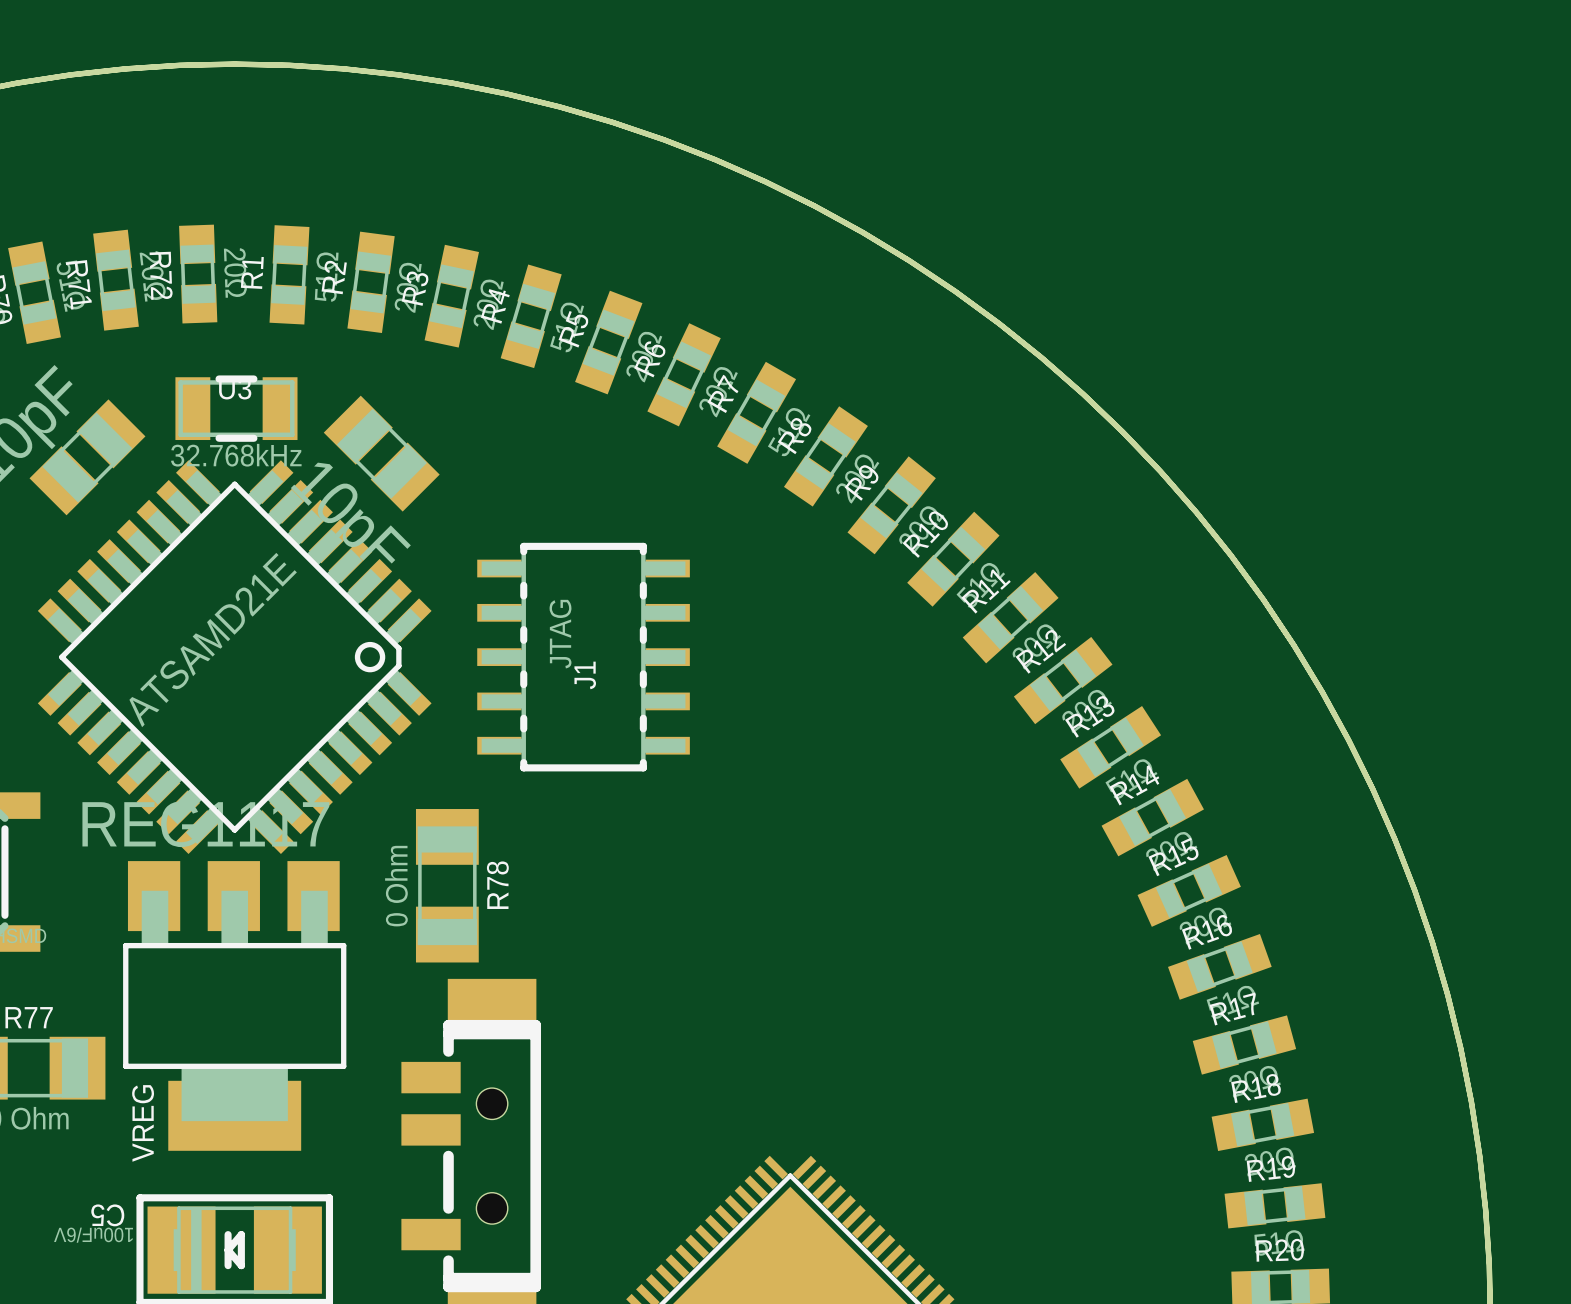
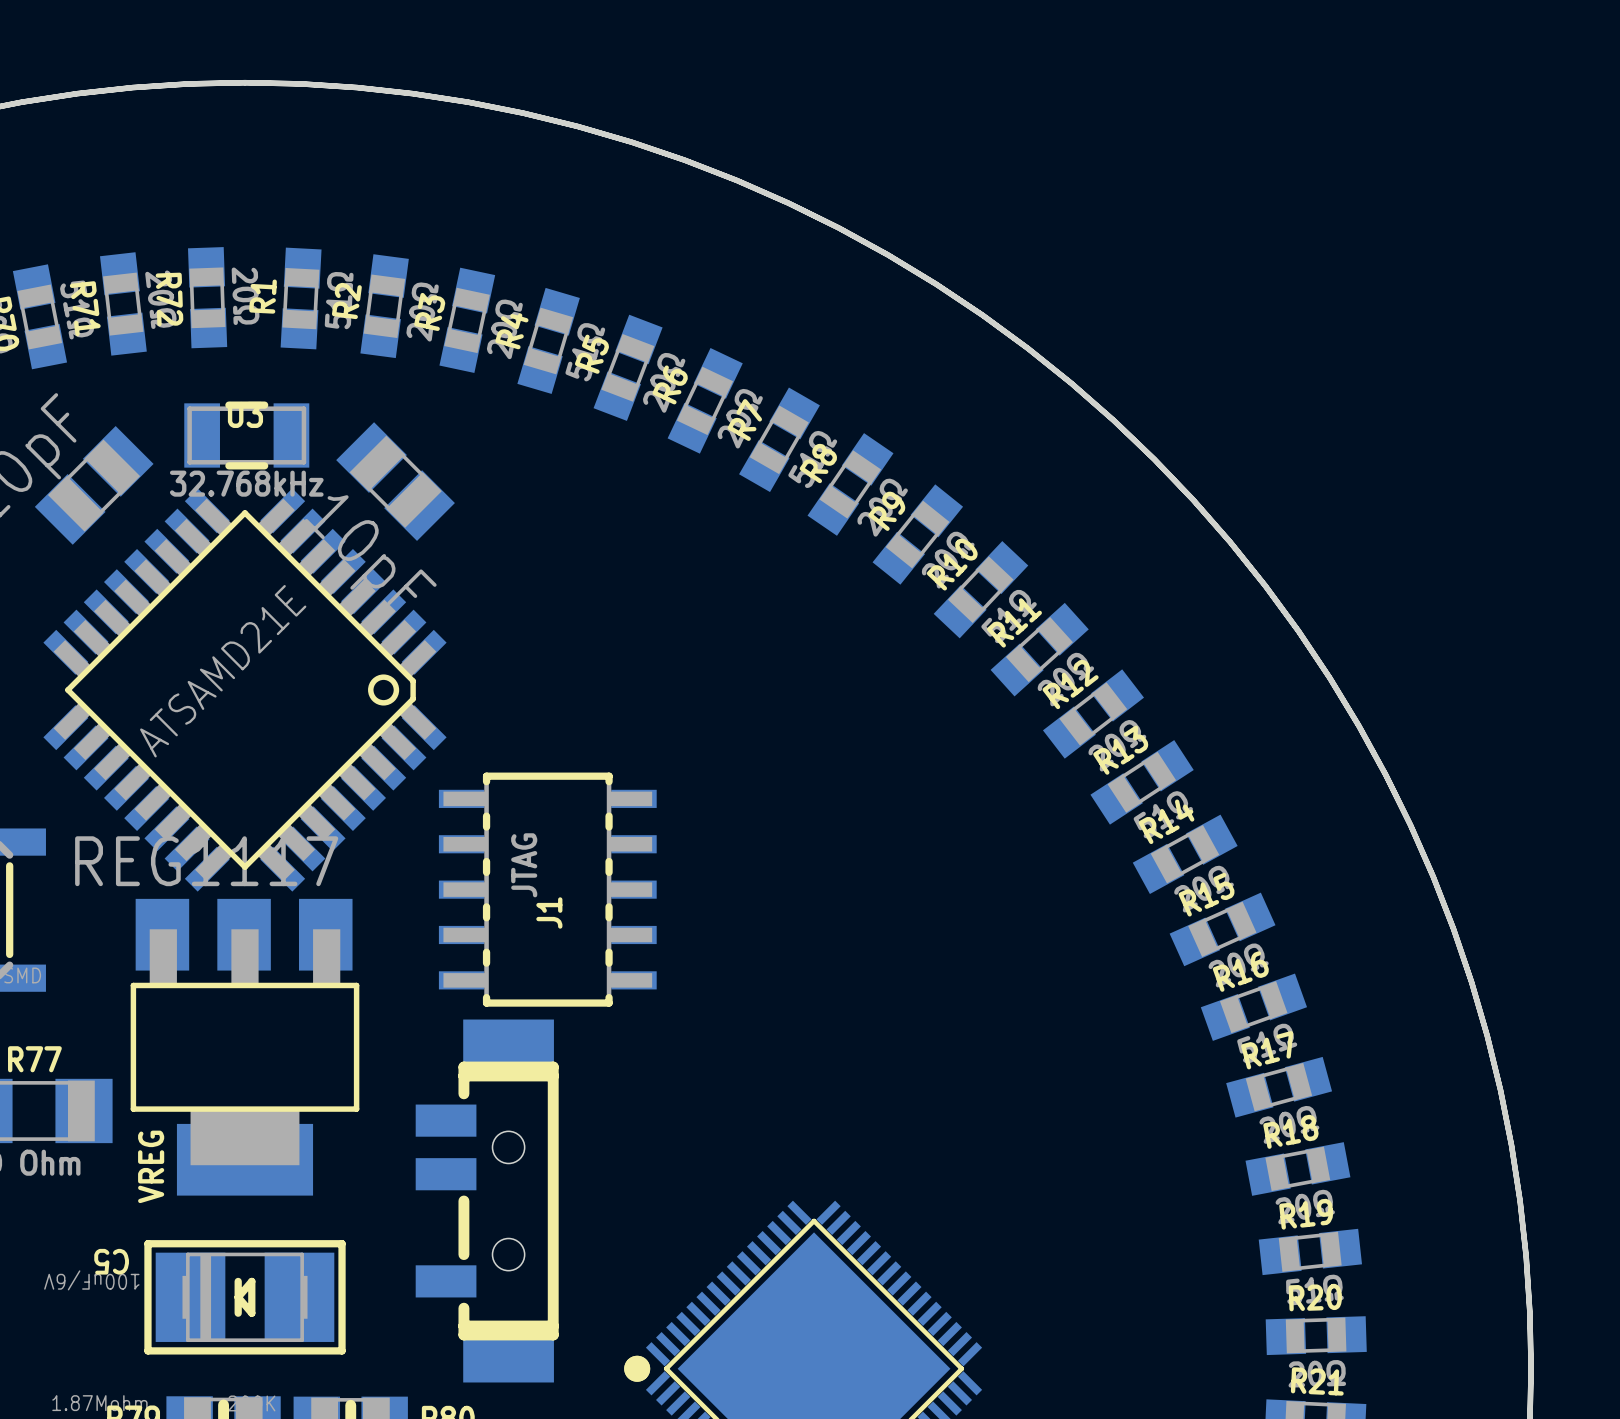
J1 position: (583, 657) -> (547, 889)
R78: 0 Ohm (447, 885) -> none

